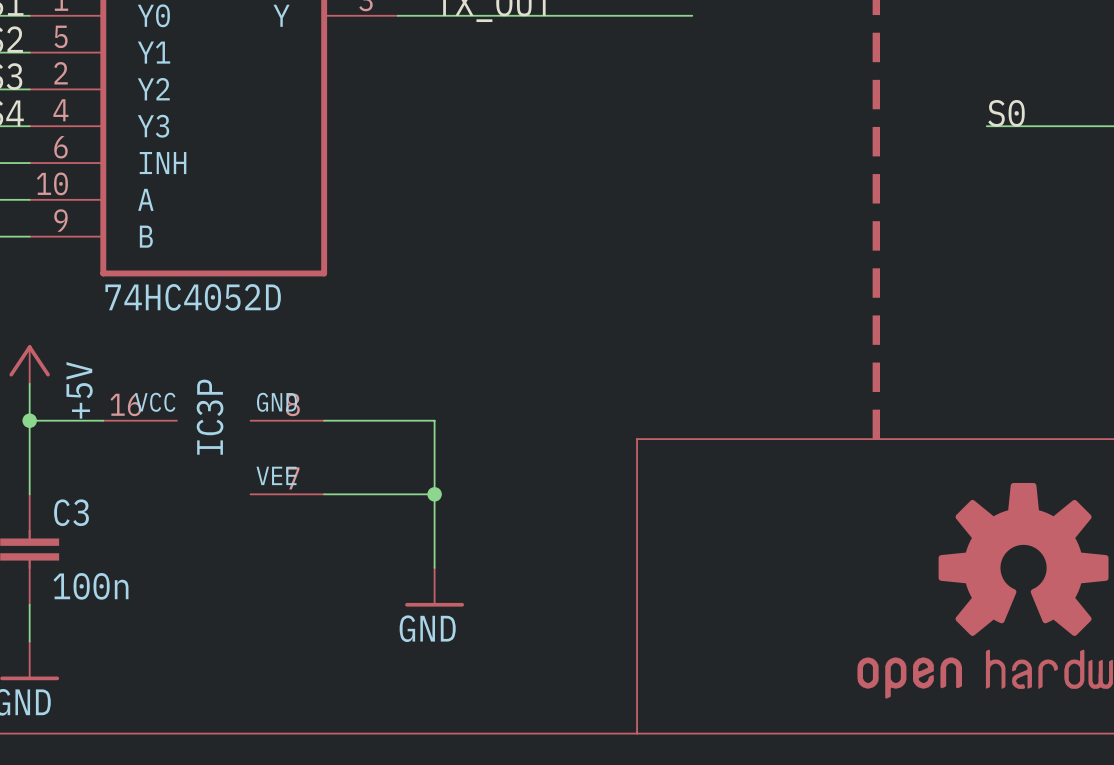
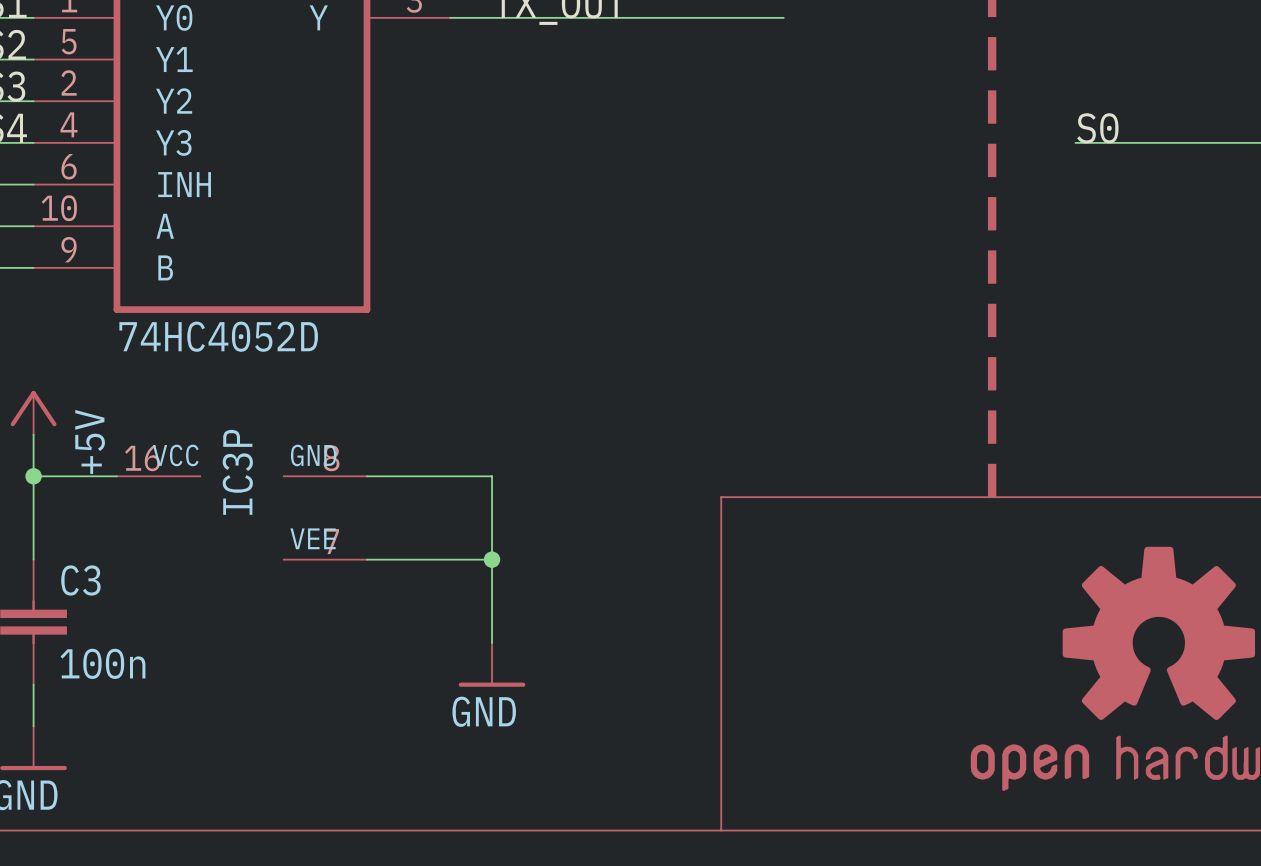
label position: S0 (1006, 113) -> S0 (1097, 128)
wire: none -> (1075, 142) (1117, 142)

